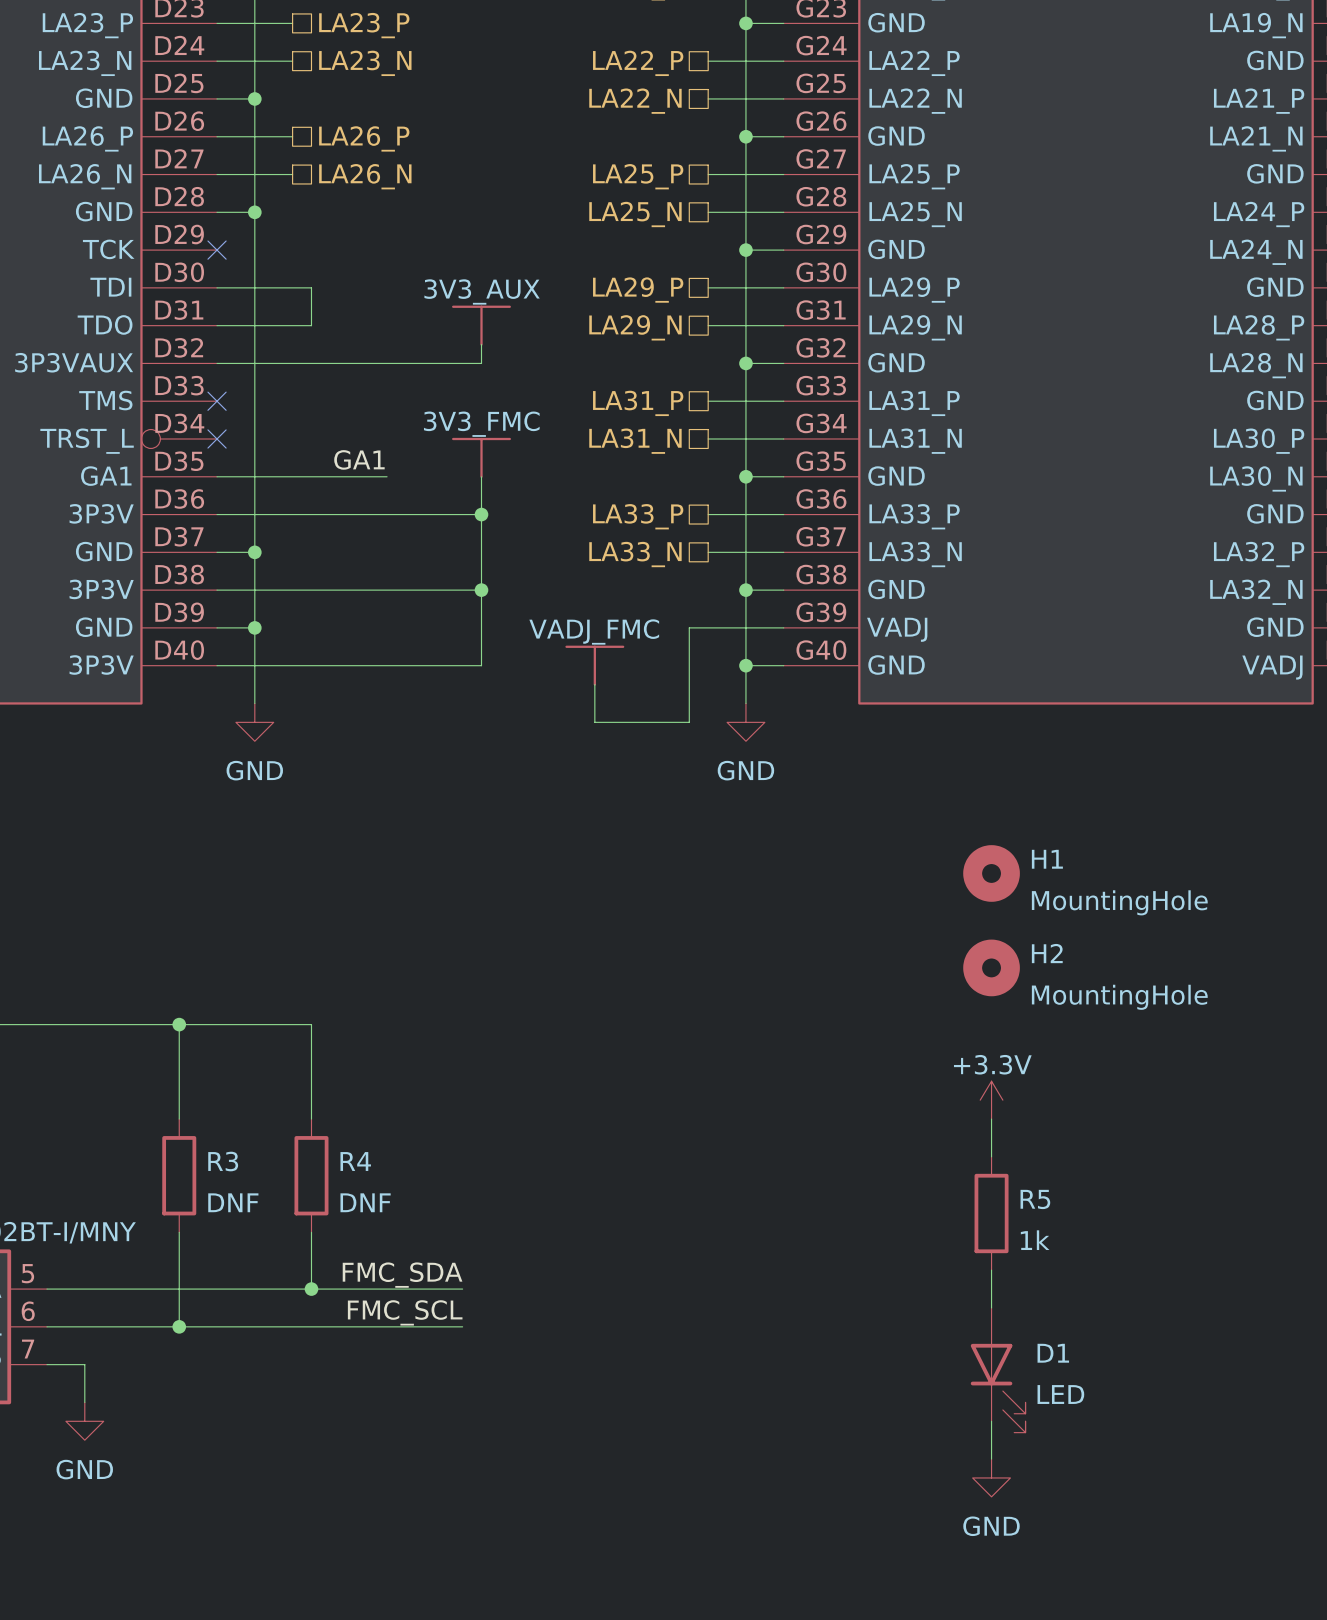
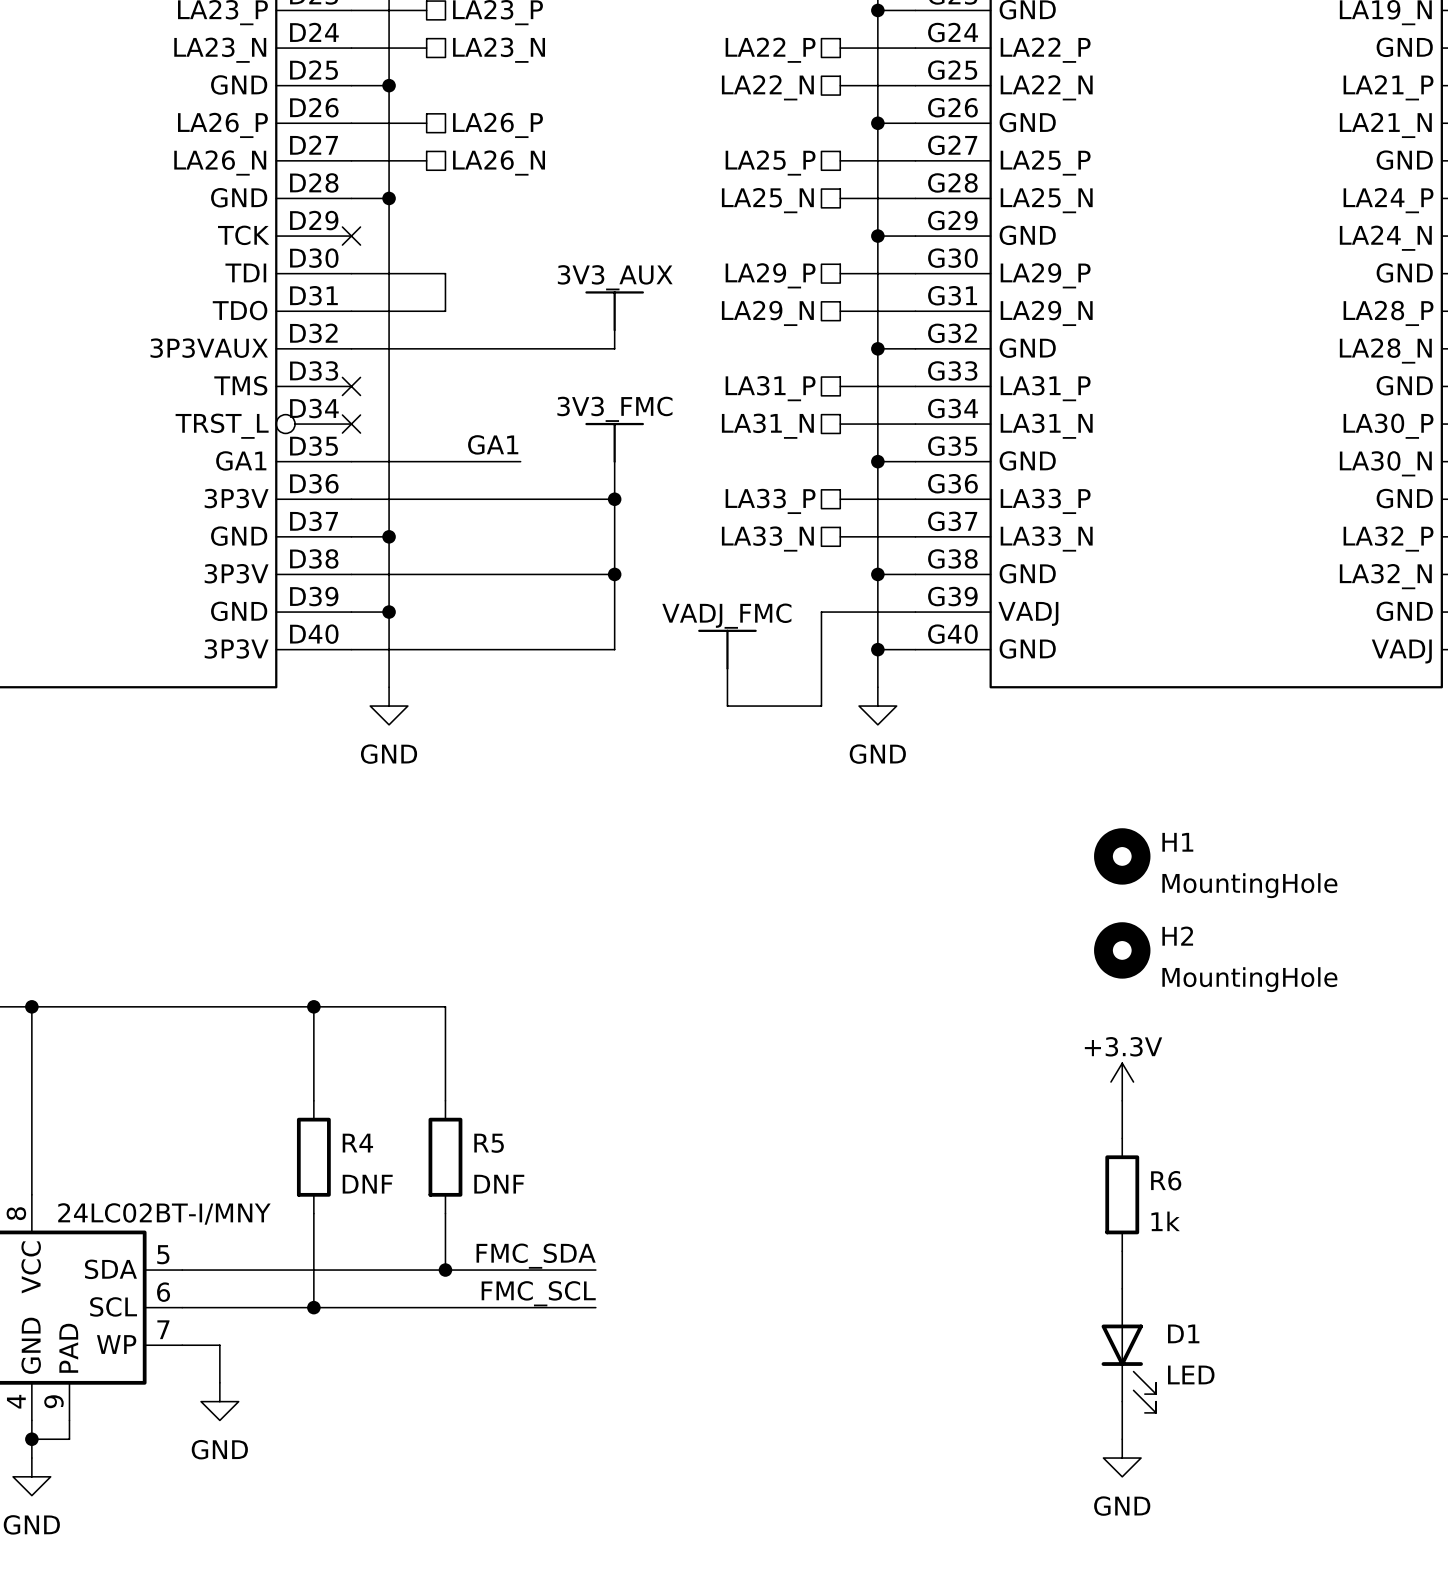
R3 name: R3 (223, 1161) -> R4 (357, 1143)
R4 name: R4 (355, 1161) -> R5 (489, 1143)
R5 name: R5 (1035, 1199) -> R6 (1166, 1180)

